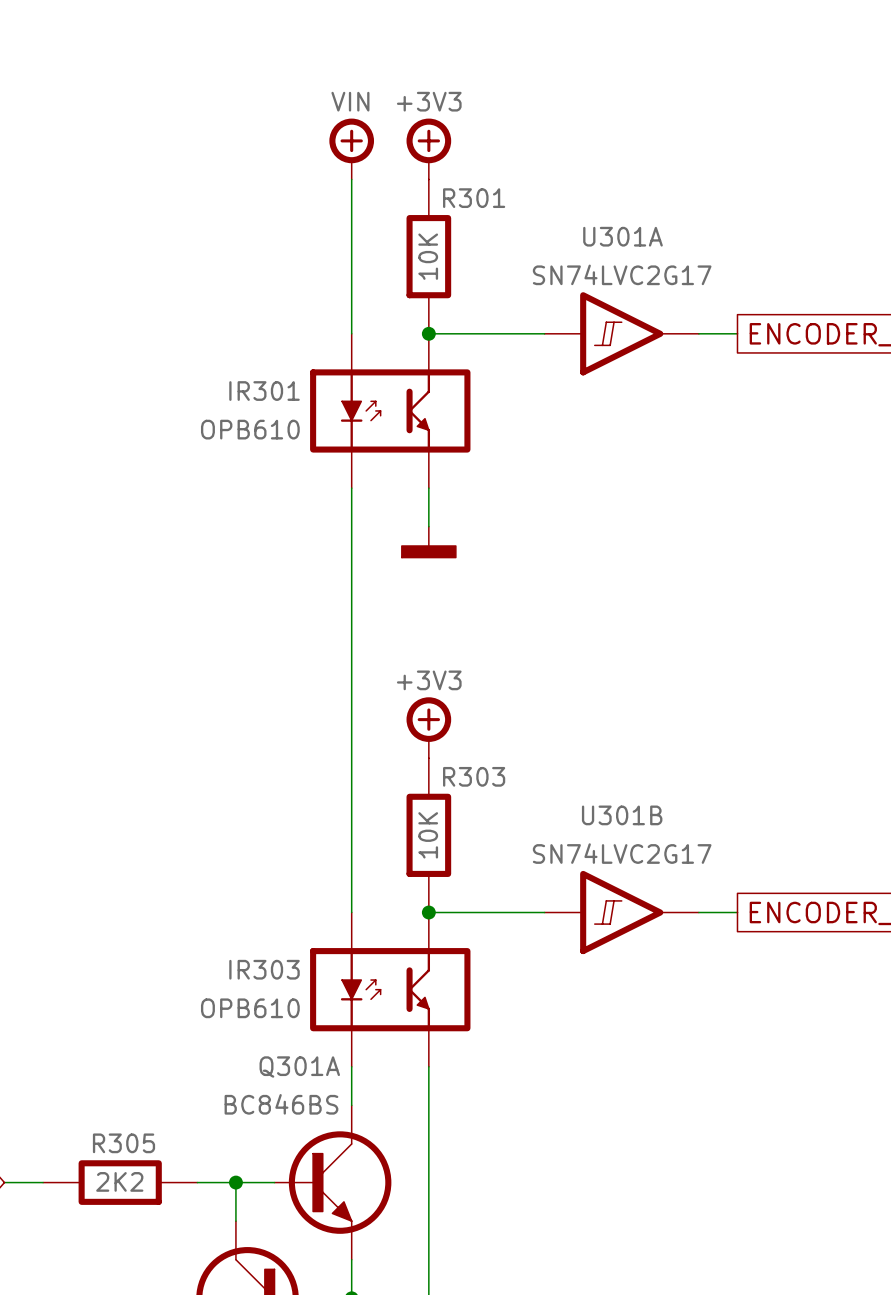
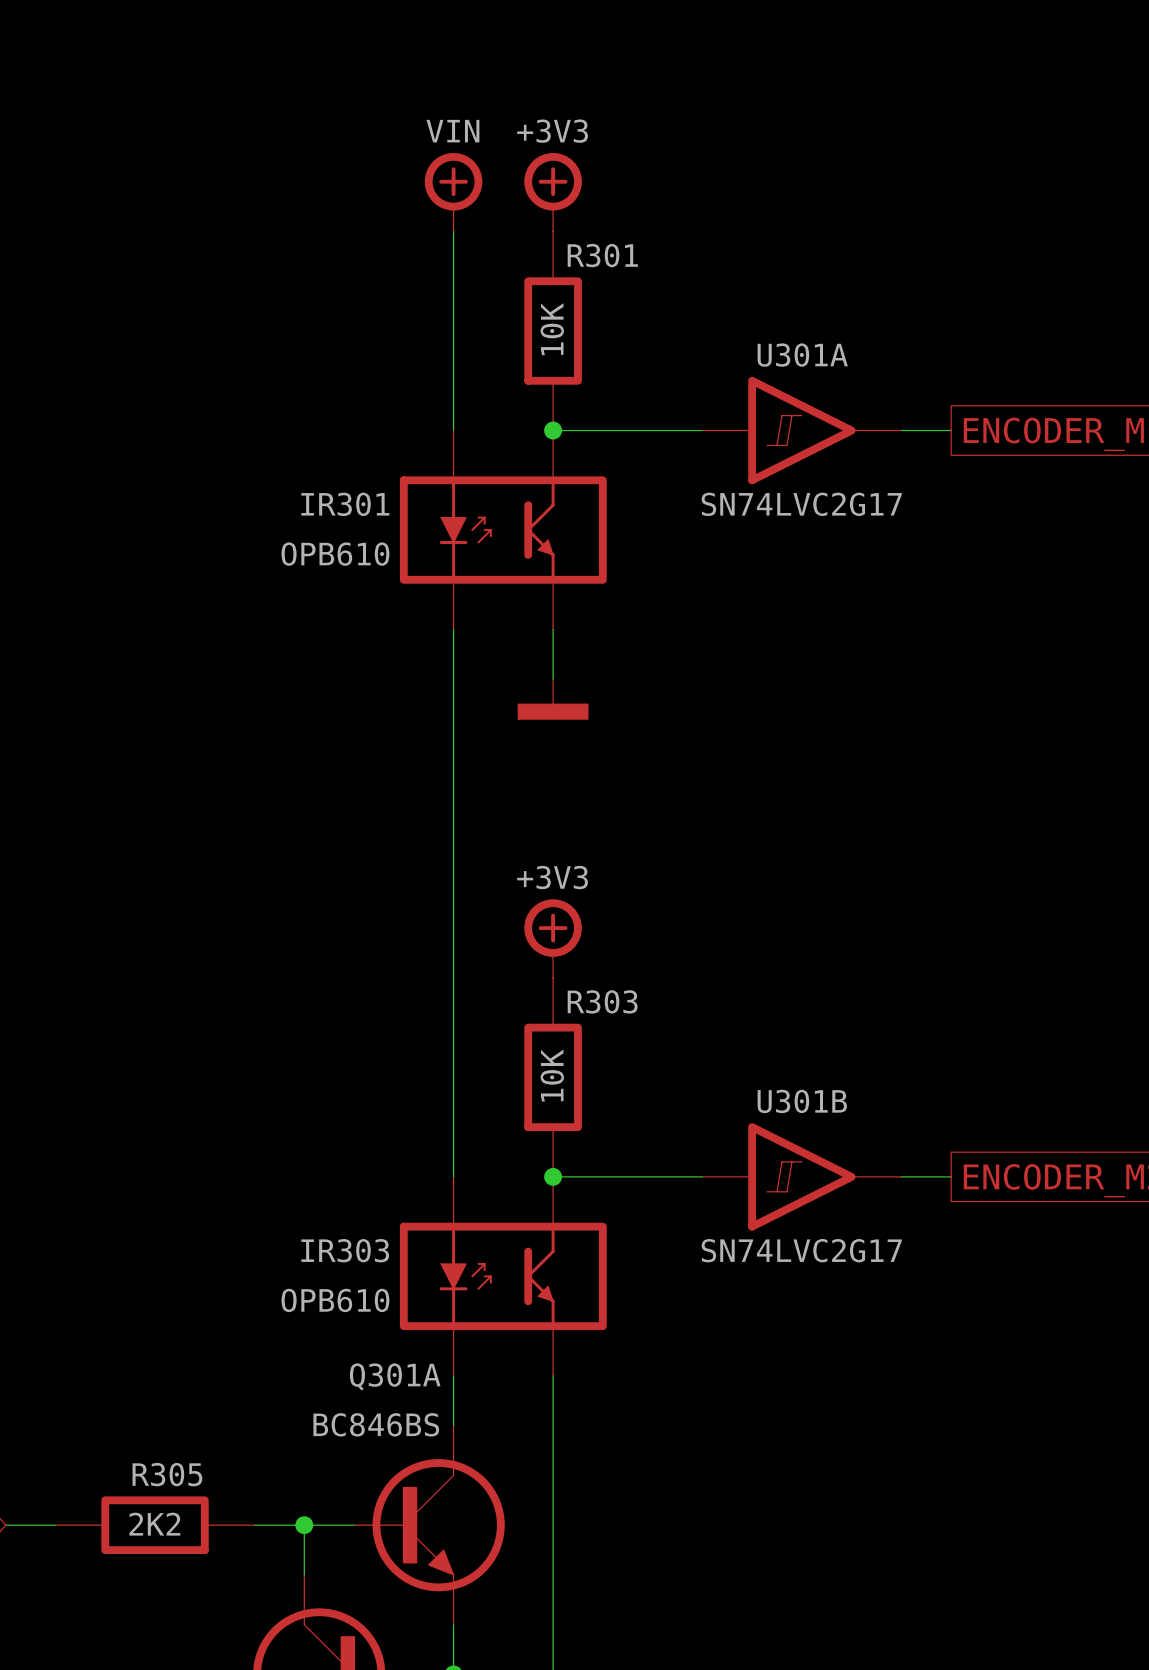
U301A name position: U301A (622, 236) -> U301A (802, 355)
U301A value position: SN74LVC2G17 (622, 274) -> SN74LVC2G17 (801, 504)
U301B name position: U301B (622, 815) -> U301B (802, 1101)
U301B value position: SN74LVC2G17 (622, 853) -> SN74LVC2G17 (801, 1250)

